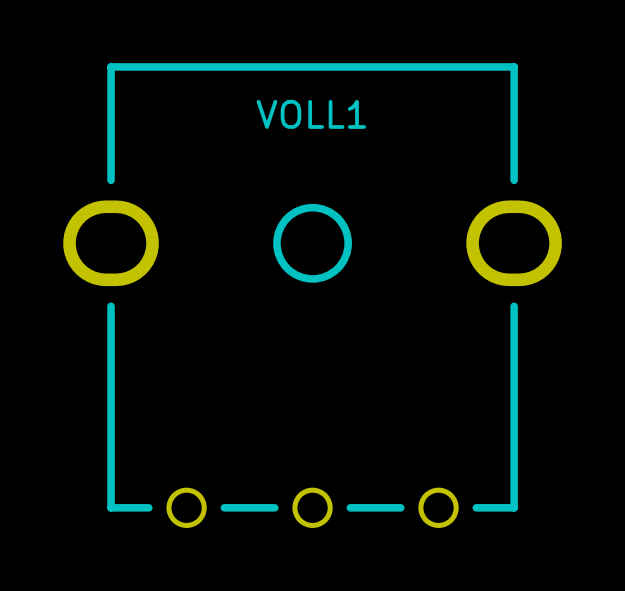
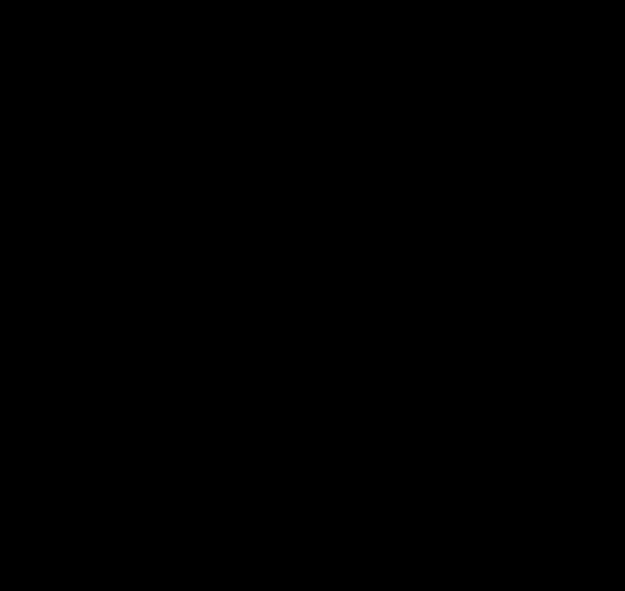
VOLL1: (312, 295) -> none

